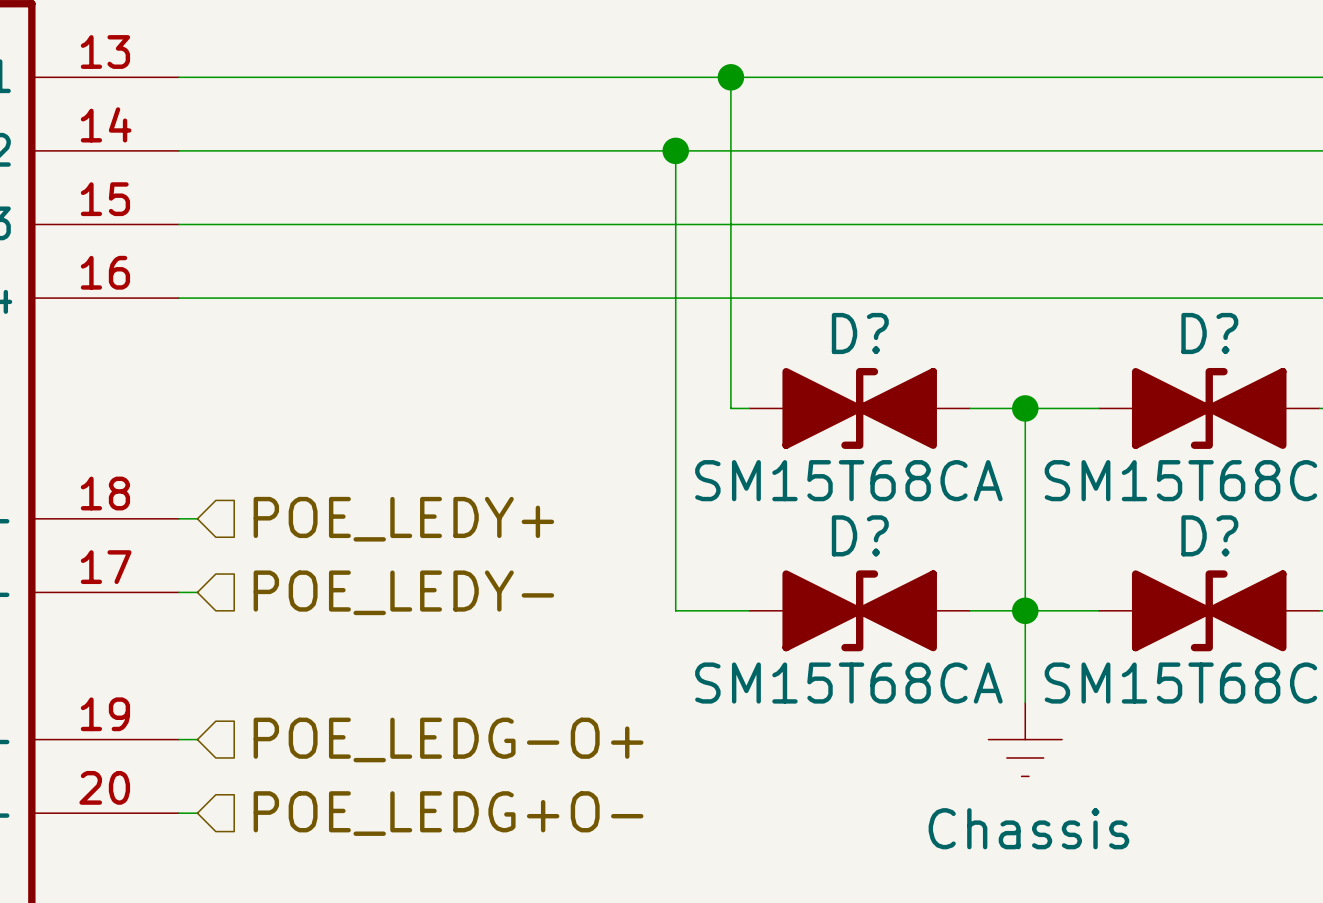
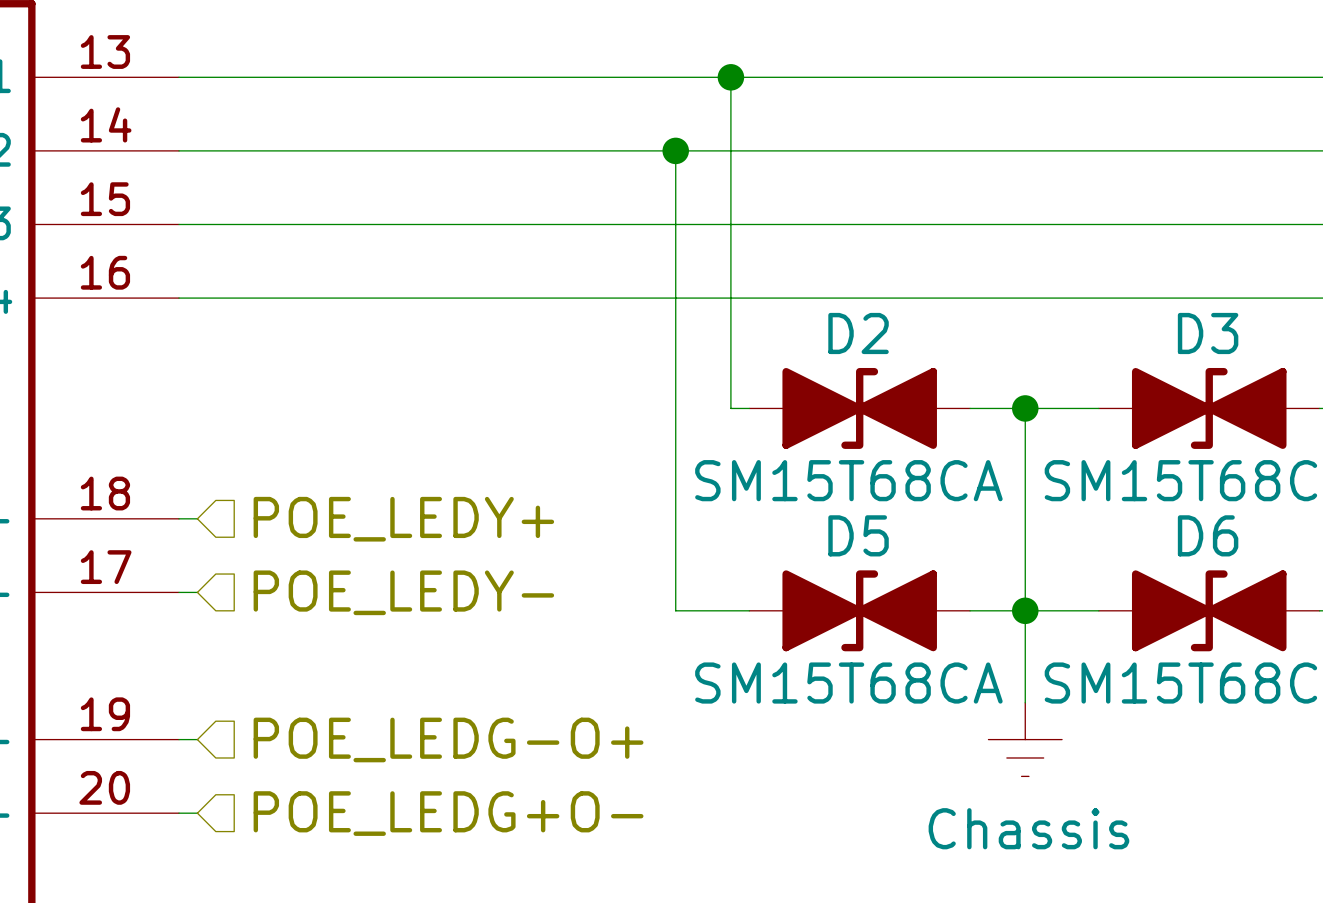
D? name: D? (860, 333) -> D2 (858, 333)
D? name: D? (1209, 333) -> D3 (1208, 333)
D? name: D? (860, 535) -> D5 (858, 535)
D? name: D? (1209, 535) -> D6 (1208, 535)

